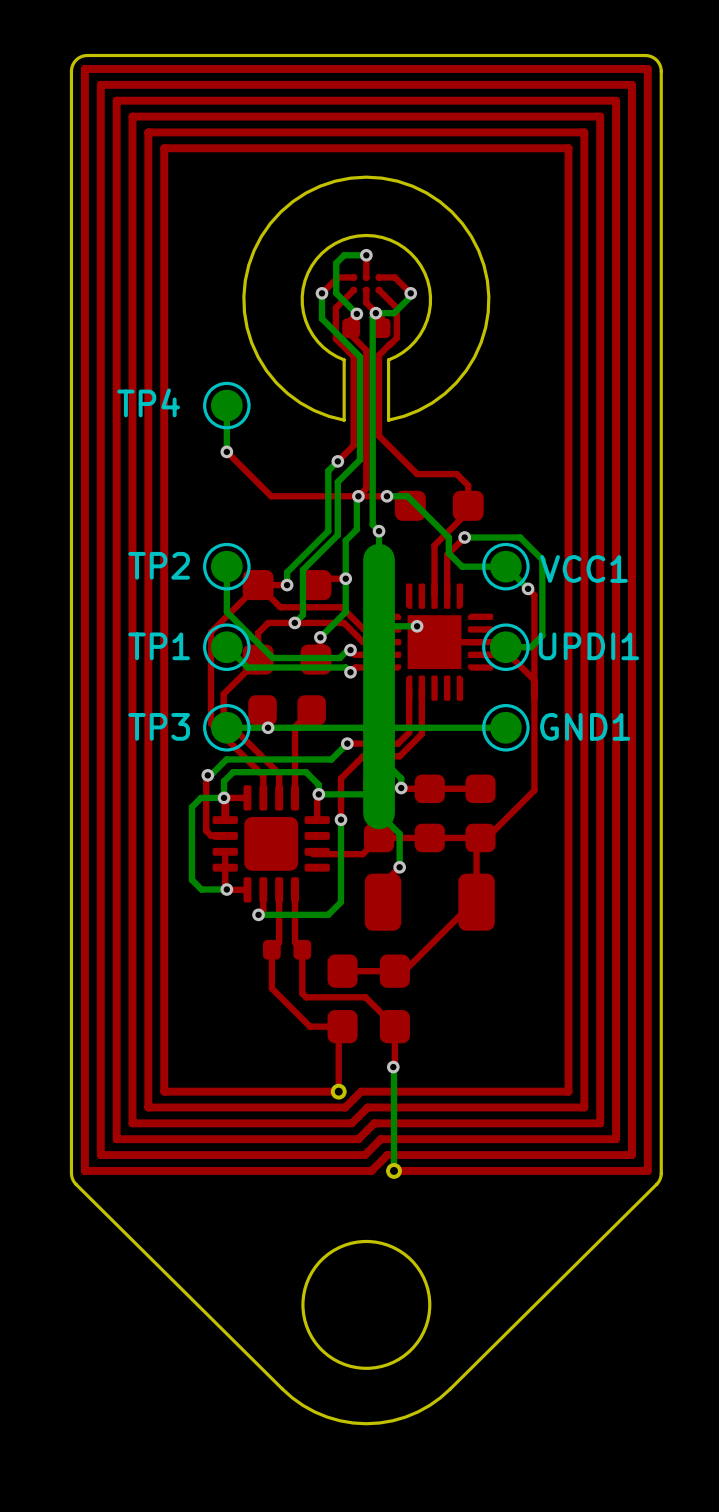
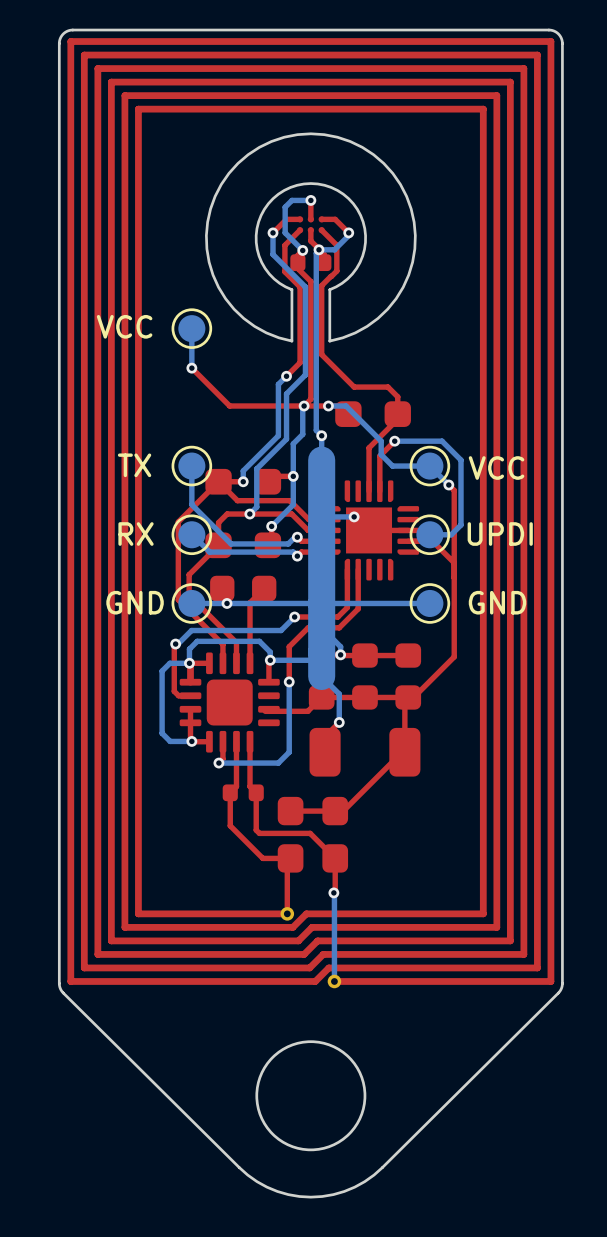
TP4 name: TP4 (148, 402) -> VCC (124, 326)
TP2 name: TP2 (159, 565) -> TX (134, 465)
VCC1 name: VCC1 (584, 568) -> VCC (496, 468)
TP1 name: TP1 (159, 646) -> RX (136, 534)
UPDI1 name: UPDI1 (588, 646) -> UPDI (500, 534)
TP3 name: TP3 (159, 726) -> GND (135, 602)
GND1 name: GND1 (585, 726) -> GND (497, 602)

